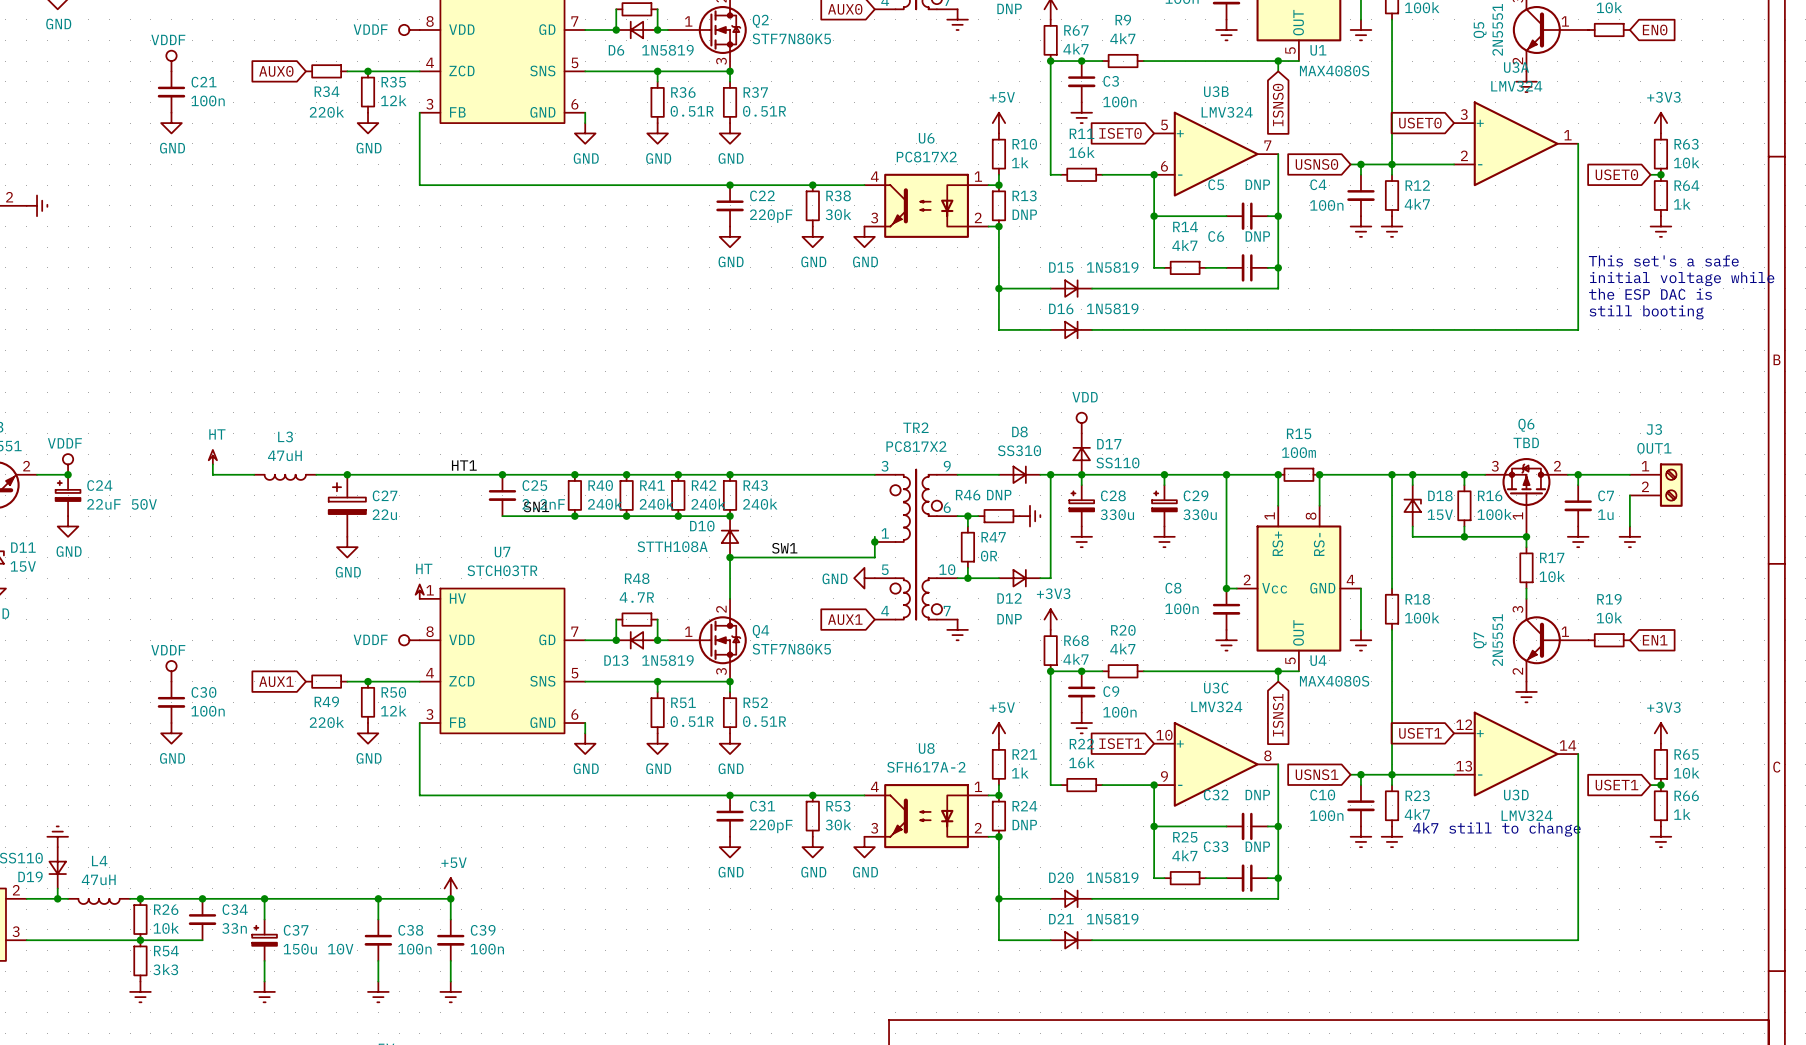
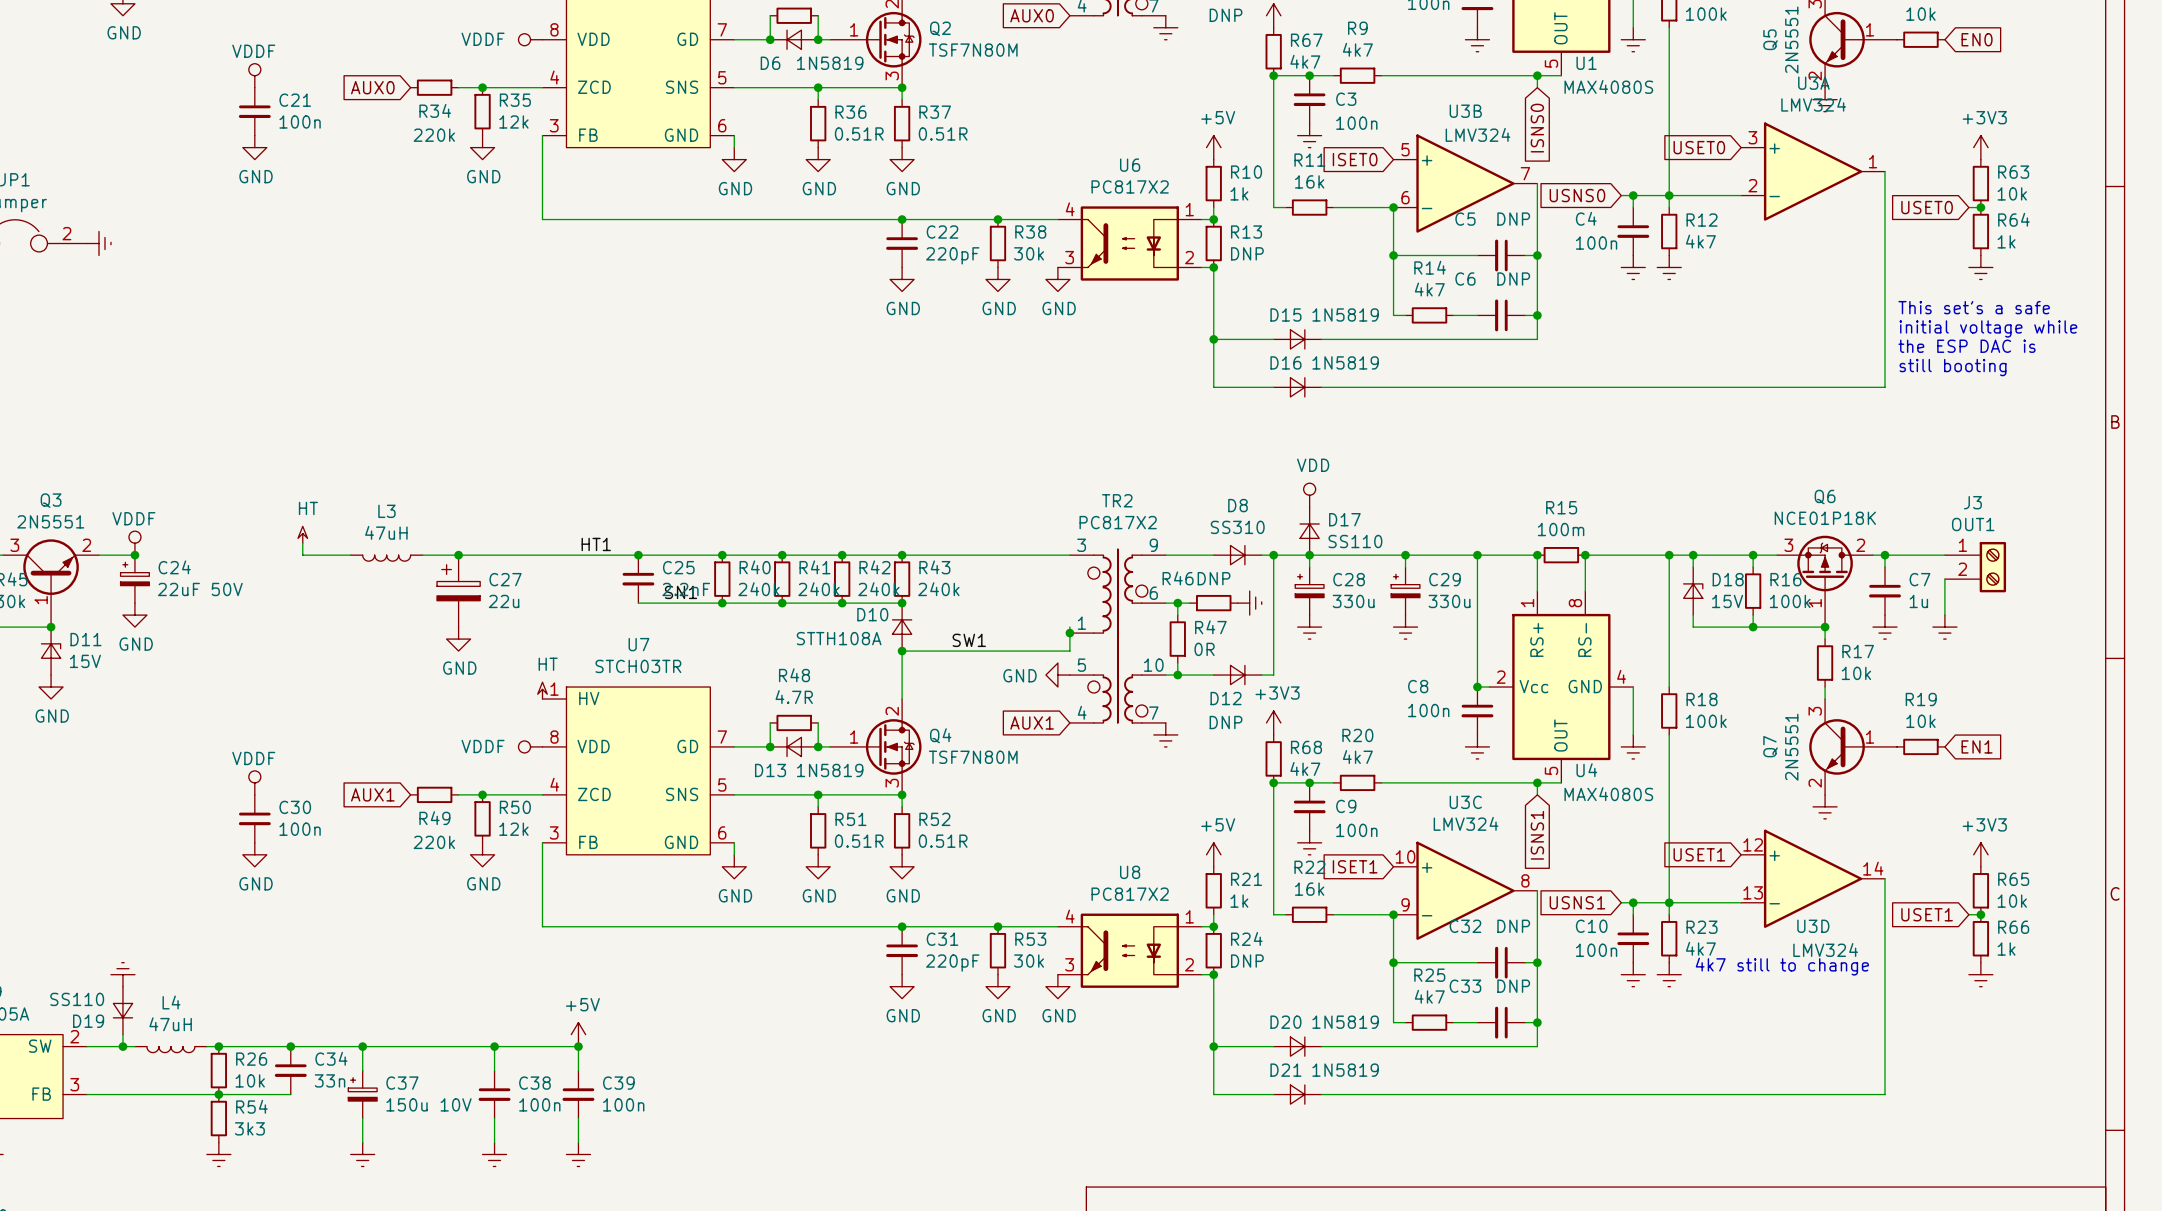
Q2 value: STF7N80K5 (791, 38) -> TSF7N80M (973, 50)
Q6 value: TBD (1526, 442) -> NCE01P18K (1825, 518)
Q4 value: STF7N80K5 (791, 649) -> TSF7N80M (973, 757)
U8 value: SFH617A-2 (926, 767) -> PC817X2 (1130, 894)

